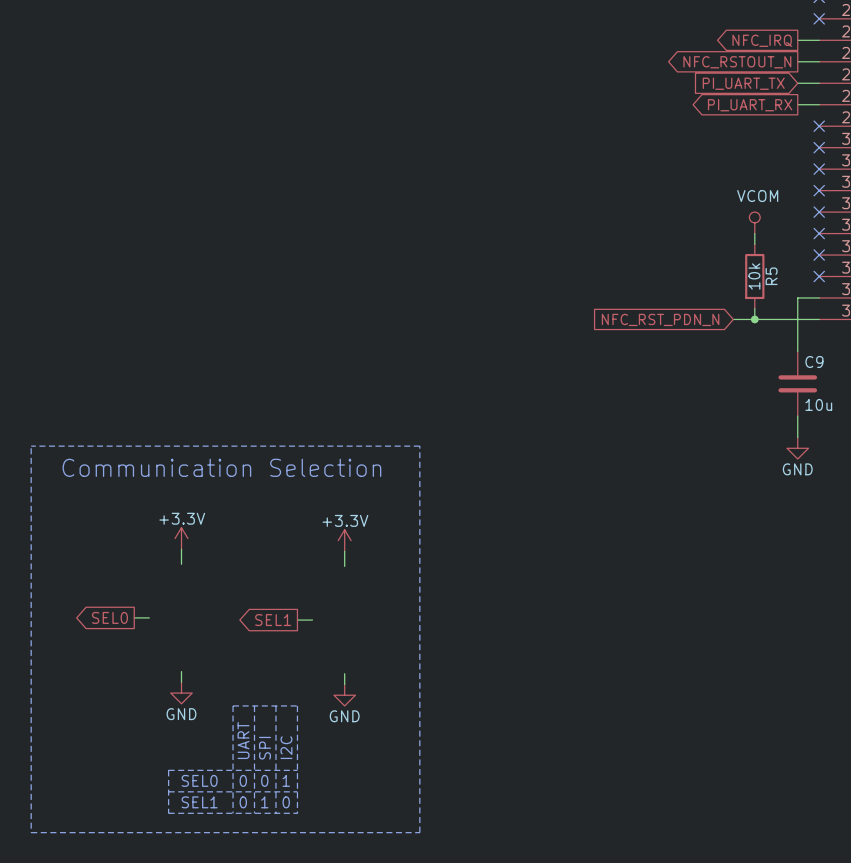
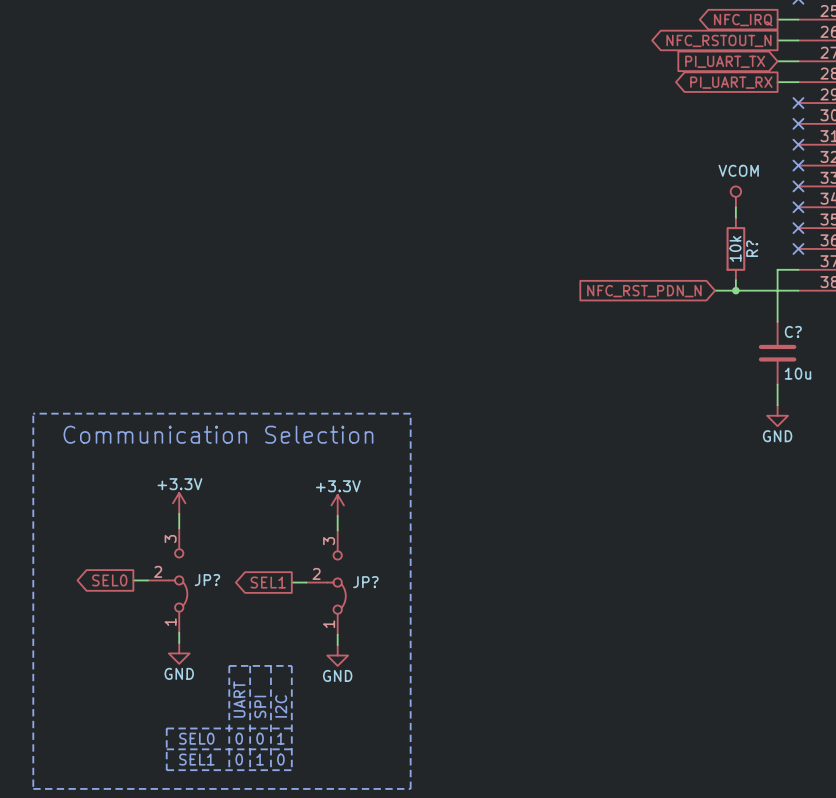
R5 name: R5 (771, 276) -> R? (752, 248)
C9 name: C9 (814, 361) -> C? (793, 331)
JP?: none -> (167, 580)
JP?: none -> (326, 582)

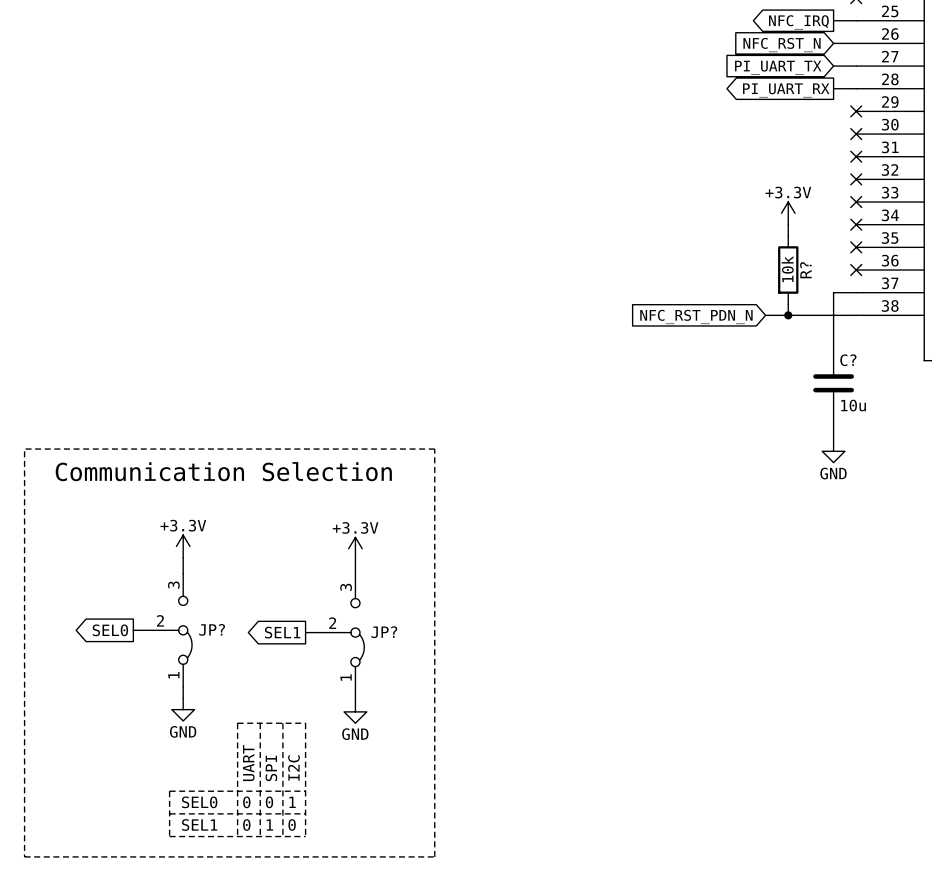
global label shape: output (718, 40) -> input (782, 45)
global label: NFC_RSTOUT_N (718, 40) -> NFC_RST_N (782, 45)
power symbol: VCOM (735, 196) -> +3.3V (788, 213)

